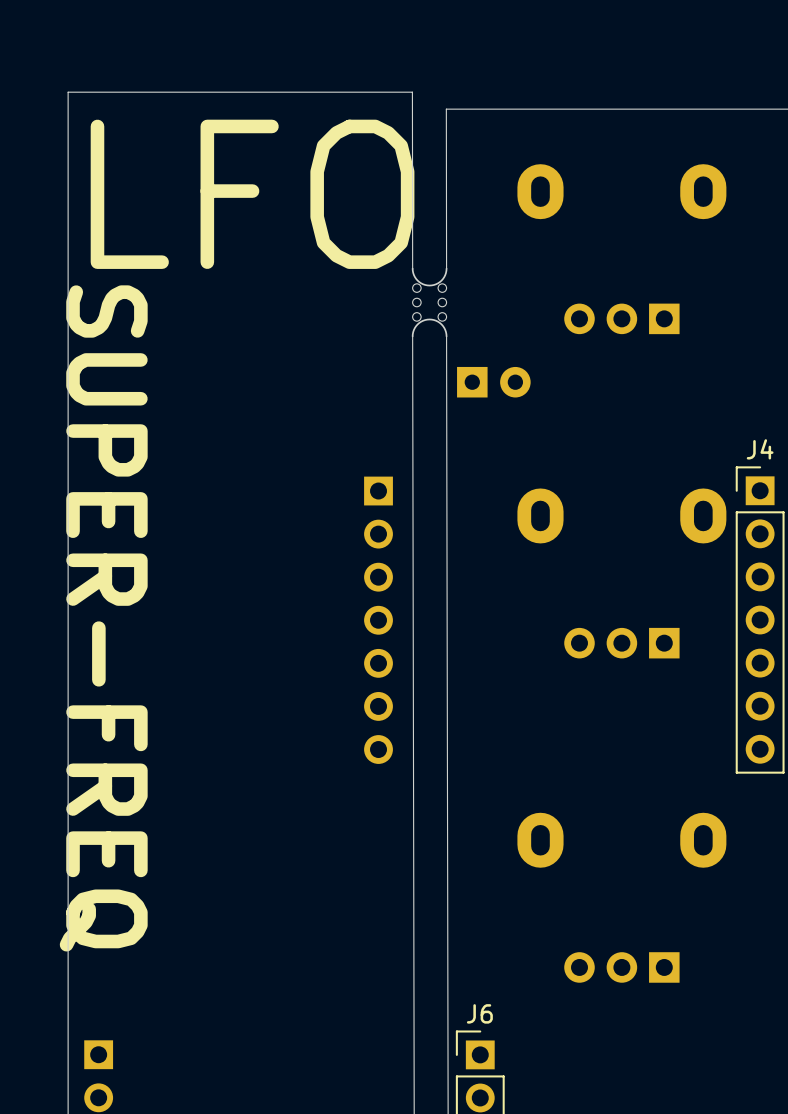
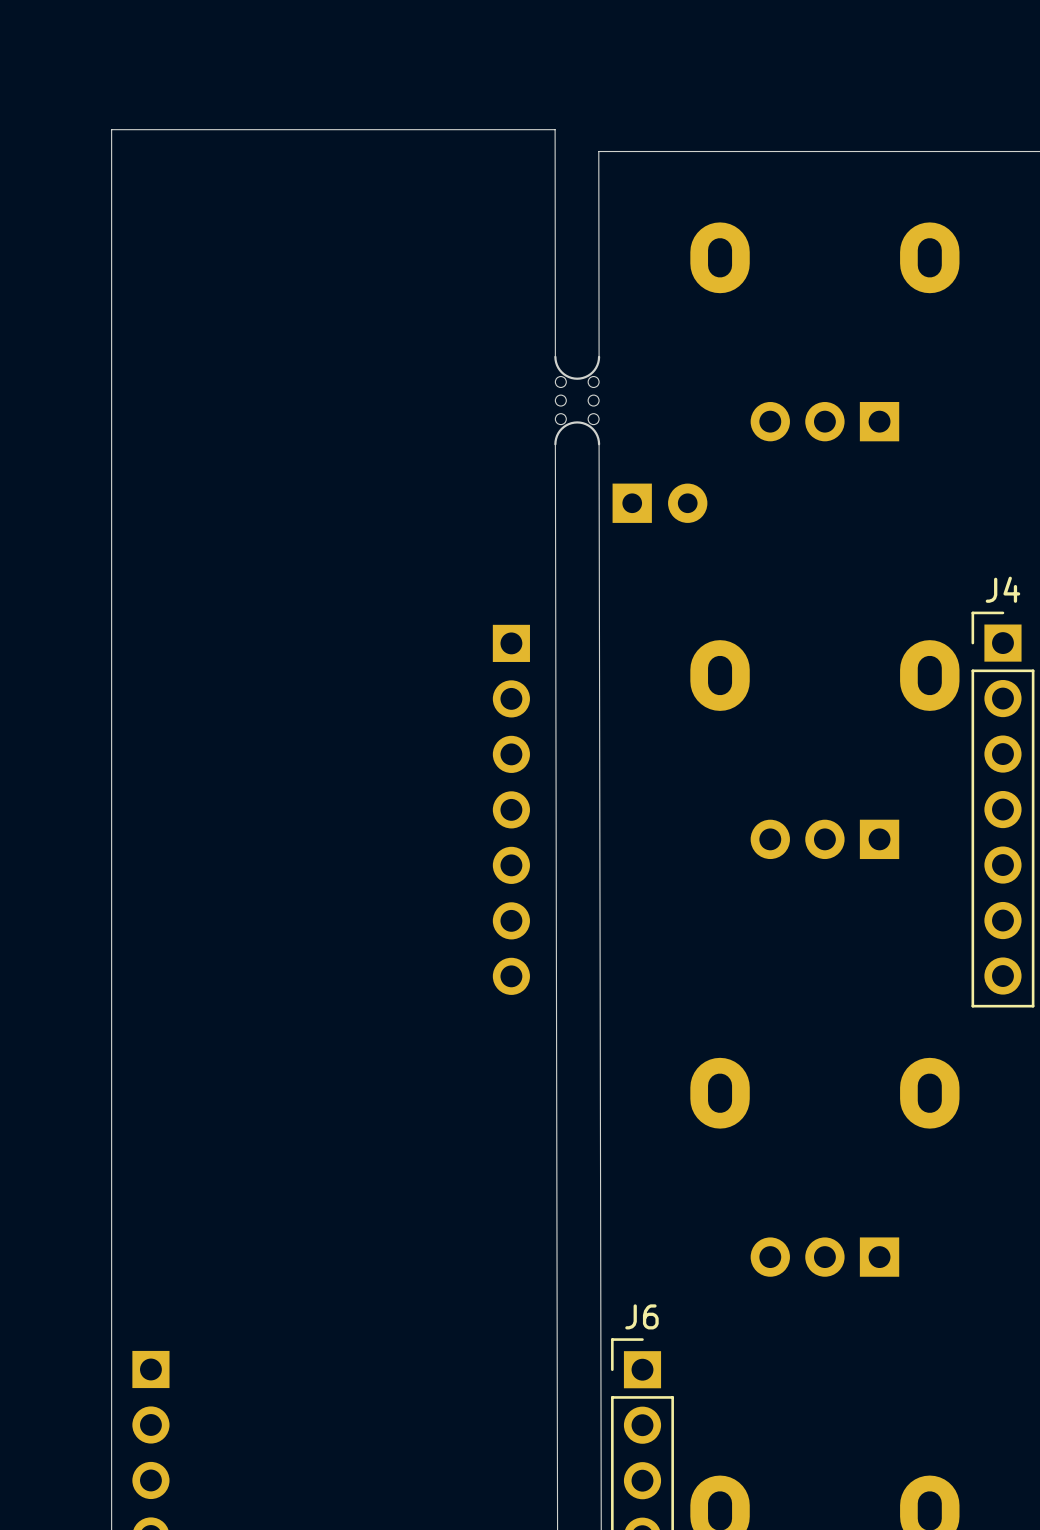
text: LFO (252, 194) -> none
text: SUPER-FREQ (103, 618) -> none

